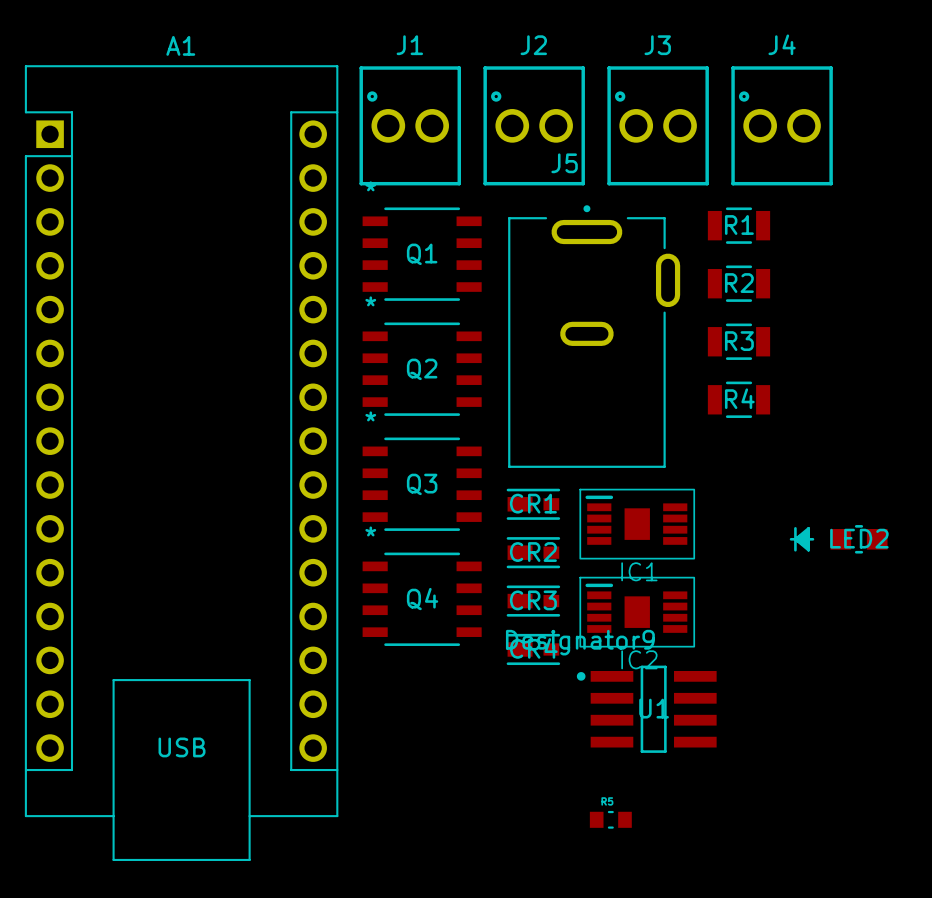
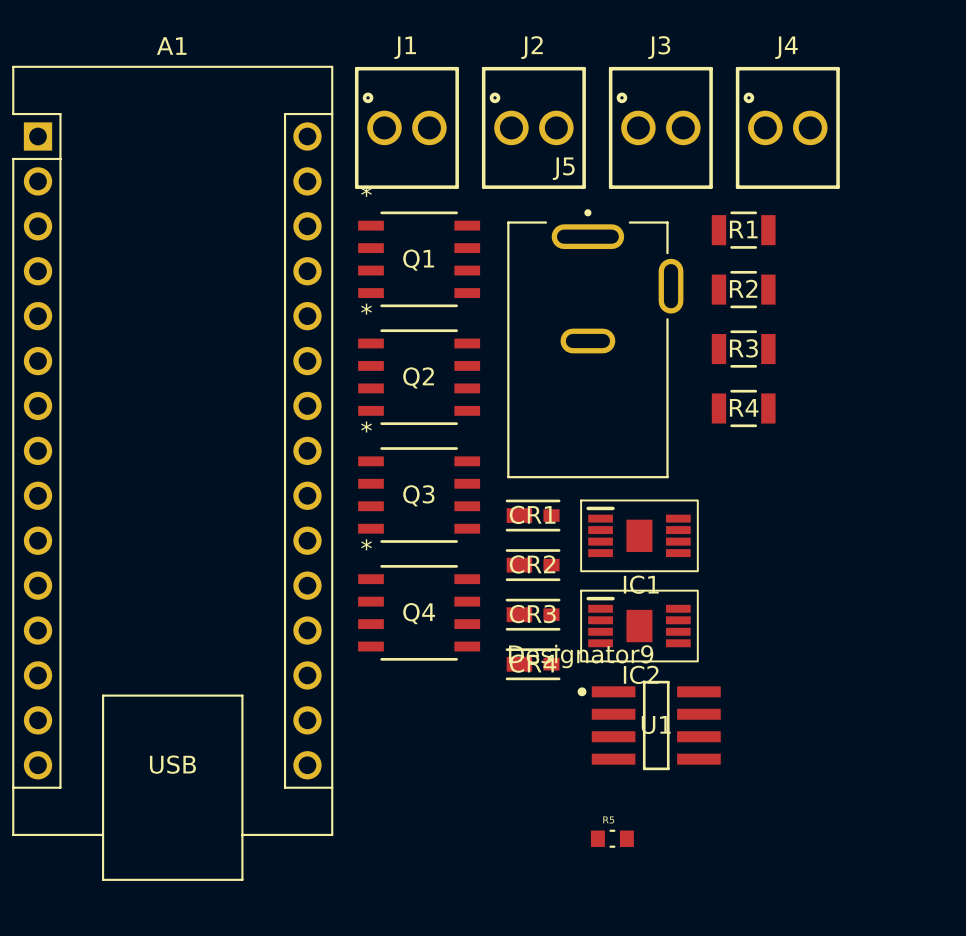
LED2: (838, 539) -> none

